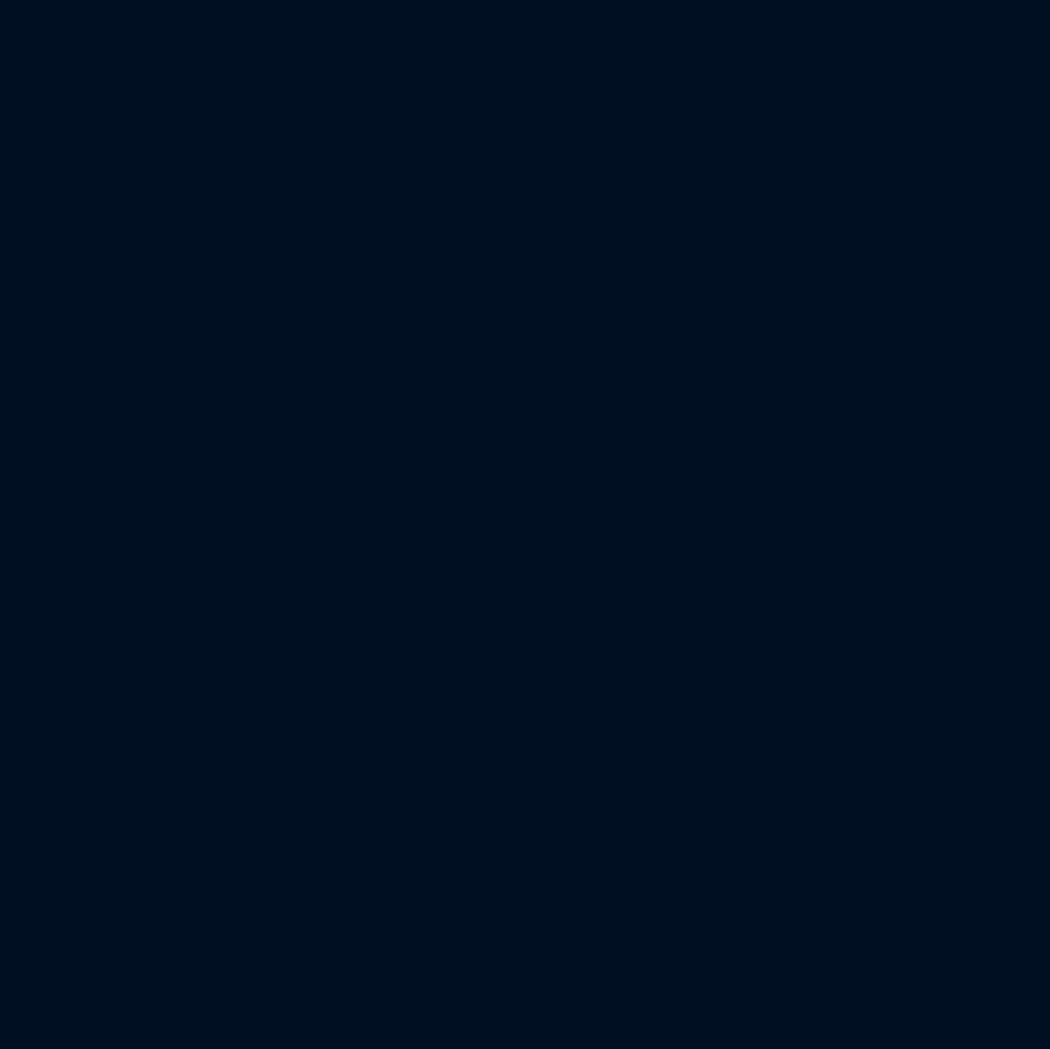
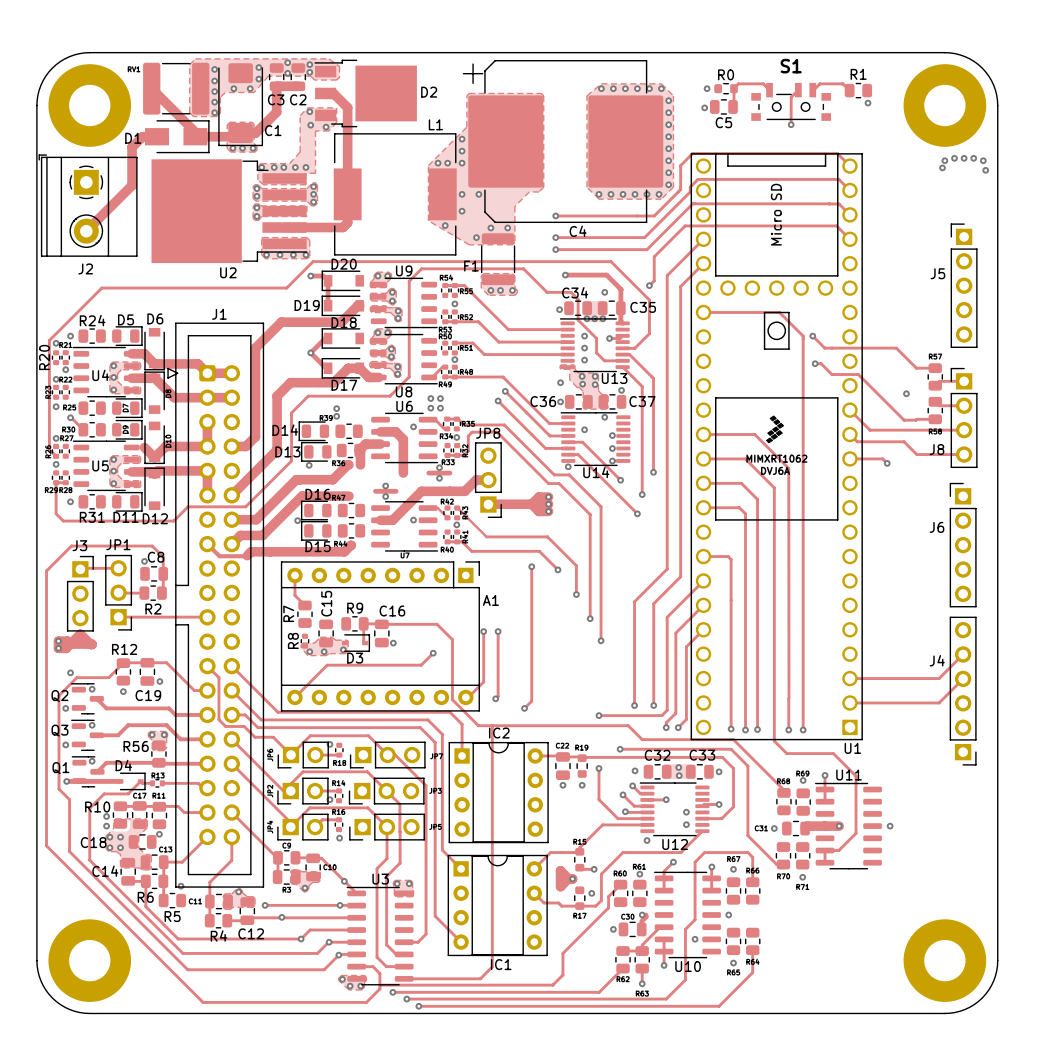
board edge: none -> (89, 52) (944, 52) (965, 56) (982, 68) (993, 85) (997, 105) (997, 960) (993, 980) (982, 998) (965, 1009) (944, 1013) (89, 1013) (69, 1009) (52, 998) (40, 980) (36, 960) (36, 105) (40, 85) (52, 68) (69, 56) (89, 52)
zone outline: none -> (195, 58) (189, 64) (189, 112) (193, 116) (216, 116) (220, 112) (220, 97) (225, 92) (254, 92) (268, 76) (310, 76) (314, 80) (336, 80) (339, 77) (339, 66) (329, 58) (195, 58)
via: none -> (287, 62)
via: none -> (309, 64)
via: none -> (258, 67)
via: none -> (214, 69)
via: none -> (309, 72)
via: none -> (287, 73)
C3: none -> (276, 77)
C2: none -> (298, 77)
via: none -> (258, 79)
via: none -> (214, 80)
zone outline: none -> (601, 83) (586, 95) (586, 187) (598, 199) (661, 199) (673, 187) (673, 95) (661, 83) (601, 83)
track: none -> (298, 86) (276, 86) (276, 112) (255, 133) (240, 133) (236, 136) (195, 136) (195, 132) (151, 88)
part: none -> (176, 88)
via: none -> (233, 88)
via: none -> (250, 88)
via: none -> (601, 88)
via: none -> (613, 88)
via: none -> (625, 88)
via: none -> (637, 88)
via: none -> (649, 88)
via: none -> (661, 88)
via: none -> (707, 88)
R0: none -> (726, 88)
track: none -> (769, 90) (763, 83) (738, 83) (733, 88) (733, 106)
track: none -> (798, 90) (791, 97) (791, 124)
track: none -> (812, 90) (819, 83) (842, 83) (849, 90)
R1: none -> (858, 90)
via: none -> (214, 91)
track: none -> (325, 93) (333, 93) (347, 107) (347, 222) (342, 227) (284, 227)
D2: none -> (365, 93)
zone outline: none -> (469, 93) (466, 95) (466, 127) (428, 165) (428, 220) (469, 244) (512, 244) (514, 242) (514, 206) (529, 191) (538, 191) (543, 187) (543, 95) (541, 93) (469, 93)
via: none -> (668, 100)
S1: none -> (791, 101)
via: none -> (214, 102)
via: none -> (868, 103)
C1: none -> (240, 104)
part: none -> (89, 105)
part: none -> (944, 105)
C5: none -> (723, 106)
zone outline: none -> (307, 107) (300, 115) (300, 152) (289, 163) (260, 163) (257, 167) (257, 179) (263, 184) (305, 184) (305, 173) (315, 173) (315, 130) (329, 130) (336, 122) (336, 107) (307, 107)
via: none -> (704, 107)
via: none -> (309, 111)
via: none -> (214, 112)
via: none -> (668, 112)
zone outline: none -> (230, 122) (227, 125) (227, 148) (230, 152) (255, 152) (256, 146) (254, 143) (254, 124) (252, 122) (230, 122)
via: none -> (668, 124)
via: none -> (791, 124)
via: none -> (310, 125)
via: none -> (326, 127)
track: none -> (157, 136) (142, 136) (132, 147) (132, 185) (86, 231)
D1: none -> (177, 136)
via: none -> (668, 136)
via: none -> (462, 139)
C4: none -> (563, 141)
via: none -> (232, 148)
via: none -> (242, 148)
via: none -> (253, 148)
via: none -> (668, 148)
via: none -> (462, 151)
via: none -> (954, 158)
via: none -> (964, 158)
via: none -> (973, 158)
via: none -> (668, 160)
via: none -> (944, 160)
via: none -> (983, 160)
via: none -> (438, 163)
via: none -> (447, 163)
via: none -> (462, 163)
track: none -> (849, 166) (837, 153) (692, 153) (680, 165) (680, 189) (654, 215) (555, 215)
via: none -> (261, 167)
via: none -> (274, 167)
via: none -> (283, 167)
via: none -> (295, 167)
via: none -> (305, 167)
via: none -> (942, 167)
via: none -> (985, 170)
via: none -> (668, 172)
zone outline: none -> (312, 182) (306, 188) (261, 188) (255, 184) (253, 186) (253, 198) (255, 201) (306, 201) (311, 205) (314, 205) (317, 203) (317, 185) (312, 182)
via: none -> (668, 184)
via: none -> (313, 186)
via: none -> (256, 188)
track: none -> (849, 190) (838, 179) (698, 179) (690, 187) (690, 191) (644, 237) (555, 237)
via: none -> (313, 194)
L1: none -> (395, 194)
via: none -> (462, 194)
via: none -> (478, 194)
via: none -> (598, 194)
via: none -> (611, 194)
via: none -> (623, 194)
via: none -> (635, 194)
via: none -> (647, 194)
via: none -> (659, 194)
via: none -> (256, 196)
via: none -> (313, 202)
zone outline: none -> (255, 203) (253, 206) (253, 218) (255, 220) (258, 220) (261, 216) (306, 216) (306, 205) (260, 205) (255, 203)
J2: none -> (88, 205)
via: none -> (256, 207)
U2: none -> (229, 211)
via: none -> (462, 211)
track: none -> (849, 214) (839, 203) (692, 203) (647, 249) (555, 249)
via: none -> (555, 215)
via: none -> (256, 216)
via: none -> (445, 225)
via: none -> (490, 228)
via: none -> (507, 228)
zone outline: none -> (262, 237) (261, 254) (265, 258) (306, 258) (309, 256) (309, 240) (306, 237) (262, 237)
via: none -> (476, 237)
via: none -> (555, 237)
track: none -> (703, 239) (667, 275) (667, 569) (634, 601) (634, 705)
track: none -> (849, 239) (836, 225) (685, 225) (654, 256) (654, 280) (649, 285)
via: none -> (555, 249)
via: none -> (266, 254)
via: none -> (279, 254)
via: none -> (293, 254)
via: none -> (305, 254)
F1: none -> (498, 259)
track: none -> (703, 263) (680, 286) (680, 576) (653, 603) (653, 705)
zone outline: none -> (377, 272) (370, 282) (370, 286) (385, 287) (386, 282) (391, 277) (391, 274) (388, 272) (377, 272)
zone outline: none -> (483, 273) (481, 276) (481, 288) (488, 295) (514, 295) (517, 292) (514, 288) (514, 276) (512, 273) (483, 273)
track: none -> (565, 275) (606, 275) (621, 289) (620, 321) (622, 323)
via: none -> (565, 275)
track: none -> (310, 276) (323, 276) (328, 280) (328, 305)
via: none -> (310, 276)
via: none -> (378, 276)
via: none -> (387, 276)
D20: none -> (342, 280)
track: none -> (445, 285) (464, 285) (508, 329) (567, 329)
via: none -> (649, 285)
J5: none -> (964, 285)
zone outline: none -> (390, 288) (386, 293) (371, 293) (370, 299) (372, 301) (387, 301) (393, 304) (396, 301) (396, 291) (390, 288)
part: none -> (445, 290)
part: none -> (454, 290)
via: none -> (490, 290)
via: none -> (500, 290)
via: none -> (512, 290)
via: none -> (392, 292)
via: none -> (604, 292)
via: none -> (392, 301)
U9: none -> (404, 302)
via: none -> (454, 303)
D19: none -> (342, 305)
track: none -> (359, 305) (341, 322) (281, 322) (255, 348) (255, 436) (245, 446) (231, 446)
zone outline: none -> (372, 305) (370, 307) (372, 312) (390, 312) (396, 321) (402, 319) (402, 310) (399, 307) (372, 305)
C34: none -> (578, 308)
C35: none -> (611, 308)
via: none -> (559, 309)
via: none -> (398, 311)
track: none -> (703, 312) (779, 312) (803, 336) (803, 730)
part: none -> (445, 316)
part: none -> (454, 316)
via: none -> (398, 318)
via: none -> (586, 318)
via: none -> (594, 318)
via: none -> (602, 318)
track: none -> (445, 321) (478, 321) (498, 342) (567, 342)
zone outline: none -> (377, 328) (370, 339) (370, 343) (385, 344) (386, 339) (391, 334) (391, 330) (388, 328) (377, 328)
via: none -> (378, 332)
via: none -> (387, 332)
track: none -> (622, 335) (620, 338) (609, 338)
via: none -> (70, 336)
R24: none -> (92, 336)
D5: none -> (127, 336)
via: none -> (584, 336)
track: none -> (812, 336) (824, 348) (896, 348) (916, 368) (935, 368)
via: none -> (812, 336)
track: none -> (328, 338) (325, 338) (310, 352) (328, 368)
D18: none -> (342, 338)
via: none -> (609, 338)
via: none -> (56, 343)
track: none -> (454, 343) (472, 343) (484, 354) (567, 354)
zone outline: none -> (390, 345) (385, 350) (371, 350) (370, 354) (372, 356) (386, 356) (392, 360) (395, 357) (395, 348) (390, 345)
U13: none -> (594, 345)
part: none -> (445, 348)
part: none -> (454, 348)
via: none -> (584, 348)
track: none -> (622, 348) (634, 348) (649, 333) (649, 300) (611, 261) (313, 261) (286, 288) (101, 288) (49, 340) (49, 449) (56, 456)
D6: none -> (154, 349)
via: none -> (391, 349)
via: none -> (310, 352)
track: none -> (131, 353) (144, 353) (154, 363) (198, 363) (207, 373) (231, 373)
track: none -> (622, 354) (629, 354) (653, 378) (653, 472)
via: none -> (391, 356)
R20: none -> (56, 357)
part: none -> (65, 357)
U8: none -> (404, 359)
via: none -> (454, 359)
via: none -> (584, 360)
track: none -> (622, 360) (604, 360) (596, 352) (596, 338) (578, 320) (578, 299) (571, 292) (547, 292) (523, 268) (421, 268) (409, 281) (409, 376) (390, 396) (308, 396) (291, 412) (291, 461) (245, 506) (188, 506) (173, 521) (63, 521) (56, 513) (56, 482) (65, 482)
zone outline: none -> (371, 361) (369, 363) (371, 368) (390, 368) (396, 377) (401, 375) (401, 364) (399, 363) (371, 361)
zone outline: none -> (112, 362) (109, 364) (109, 390) (112, 393) (139, 393) (139, 387) (123, 387) (117, 381) (117, 373) (121, 369) (138, 369) (140, 363) (138, 362) (112, 362)
track: none -> (815, 363) (821, 363) (831, 374) (858, 374) (904, 420) (935, 419)
via: none -> (815, 363)
zone outline: none -> (561, 364) (561, 369) (569, 369) (569, 379) (583, 391) (584, 409) (608, 407) (608, 396) (602, 394) (598, 390) (598, 375) (596, 373) (578, 373) (574, 364) (561, 364)
via: none -> (113, 365)
via: none -> (397, 366)
track: none -> (445, 367) (442, 367) (432, 377) (429, 377)
track: none -> (622, 367) (642, 386) (642, 494)
D17: none -> (342, 368)
via: none -> (65, 369)
U4: none -> (106, 372)
part: none -> (445, 372)
part: none -> (454, 372)
via: none -> (397, 374)
via: none -> (582, 376)
via: none -> (595, 376)
part: none -> (935, 376)
via: none -> (113, 377)
track: none -> (378, 377) (368, 377) (359, 368) (348, 368) (333, 382) (290, 382) (277, 396) (277, 449) (231, 495)
track: none -> (445, 377) (503, 377) (549, 423) (568, 423)
track: none -> (131, 378) (154, 377) (174, 397) (231, 397)
via: none -> (56, 379)
track: none -> (964, 381) (939, 381) (935, 385)
via: none -> (560, 382)
via: none -> (582, 384)
via: none -> (595, 384)
via: none -> (113, 389)
via: none -> (621, 390)
track: none -> (505, 391) (549, 435) (568, 435)
via: none -> (505, 391)
part: none -> (56, 392)
part: none -> (65, 392)
part: none -> (154, 392)
via: none -> (906, 393)
via: none -> (430, 398)
via: none -> (440, 398)
track: none -> (498, 400) (545, 448) (568, 448)
via: none -> (498, 400)
via: none -> (560, 401)
C36: none -> (578, 401)
C37: none -> (612, 401)
track: none -> (935, 401) (939, 405) (964, 405)
via: none -> (56, 406)
part: none -> (92, 408)
part: none -> (127, 408)
via: none -> (336, 408)
via: none -> (430, 408)
via: none -> (440, 408)
track: none -> (849, 410) (869, 430) (964, 430)
part: none -> (935, 410)
via: none -> (336, 416)
via: none -> (70, 417)
track: none -> (71, 417) (83, 429)
via: none -> (604, 417)
J8: none -> (964, 417)
track: none -> (428, 419) (435, 419) (444, 428) (447, 428)
track: none -> (447, 419) (458, 419) (463, 424) (504, 424) (554, 474) (569, 474) (601, 506) (601, 640)
track: none -> (207, 422) (207, 446) (165, 446) (154, 457) (144, 447)
part: none -> (447, 424)
part: none -> (456, 424)
via: none -> (413, 426)
part: none -> (92, 429)
part: none -> (127, 429)
via: none -> (584, 429)
D14: none -> (313, 431)
part: none -> (349, 431)
track: none -> (380, 431) (395, 431) (403, 439) (403, 473)
track: none -> (703, 434) (754, 434) (788, 468) (788, 698)
track: none -> (849, 434) (857, 441) (904, 441) (916, 454) (964, 454)
via: none -> (612, 435)
U6: none -> (404, 437)
via: none -> (456, 437)
via: none -> (56, 438)
U14: none -> (595, 439)
part: none -> (154, 442)
track: none -> (568, 442) (582, 442) (620, 480)
track: none -> (380, 444) (365, 444) (359, 450) (360, 464)
U1: none -> (776, 446)
via: none -> (612, 448)
part: none -> (350, 450)
part: none -> (447, 450)
part: none -> (457, 450)
part: none -> (56, 451)
part: none -> (65, 451)
D13: none -> (316, 451)
track: none -> (568, 454) (578, 454) (637, 513)
zone outline: none -> (112, 455) (109, 458) (109, 484) (112, 487) (139, 487) (139, 480) (123, 480) (117, 474) (117, 467) (121, 463) (138, 463) (140, 457) (138, 455) (112, 455)
track: none -> (447, 455) (463, 455) (468, 450) (468, 436) (472, 432) (497, 432) (548, 483) (559, 483) (590, 514) (590, 618)
track: none -> (703, 458) (745, 458) (774, 487) (774, 741) (786, 753) (833, 753) (856, 776) (856, 833) (838, 850) (825, 850) (825, 862)
track: none -> (849, 458) (882, 458) (887, 463)
via: none -> (113, 459)
via: none -> (612, 461)
via: none -> (887, 463)
via: none -> (56, 464)
track: none -> (348, 464) (332, 479) (296, 479) (256, 519) (231, 519)
U5: none -> (106, 465)
via: none -> (309, 465)
via: none -> (568, 466)
via: none -> (439, 467)
via: none -> (113, 471)
track: none -> (131, 471) (152, 471) (154, 473) (157, 470) (207, 470) (207, 495)
via: none -> (653, 472)
track: none -> (428, 473) (449, 473)
part: none -> (56, 477)
part: none -> (65, 477)
via: none -> (439, 478)
track: none -> (488, 480) (476, 480) (464, 491) (421, 491) (392, 520) (380, 520)
JP8: none -> (488, 480)
via: none -> (620, 480)
via: none -> (113, 483)
track: none -> (703, 483) (741, 483) (757, 499) (757, 729)
via: none -> (385, 485)
D12: none -> (154, 488)
track: none -> (375, 491) (396, 491)
via: none -> (642, 494)
track: none -> (348, 496) (302, 496) (262, 535) (240, 535) (231, 544)
via: none -> (385, 496)
track: none -> (548, 497) (538, 497) (531, 504) (538, 511) (548, 511)
via: none -> (548, 497)
via: none -> (70, 501)
R31: none -> (92, 501)
D11: none -> (127, 501)
track: none -> (548, 504) (488, 504)
via: none -> (548, 504)
track: none -> (703, 507) (739, 507) (745, 513) (745, 730)
track: none -> (428, 508) (437, 508) (447, 517)
track: none -> (457, 508) (486, 536) (547, 536) (576, 565) (576, 594)
D16: none -> (316, 510)
part: none -> (351, 510)
via: none -> (548, 511)
part: none -> (447, 512)
part: none -> (457, 512)
via: none -> (637, 513)
via: none -> (297, 520)
via: none -> (413, 520)
via: none -> (456, 524)
part: none -> (404, 526)
D15: none -> (316, 530)
part: none -> (351, 530)
part: none -> (447, 536)
part: none -> (457, 536)
track: none -> (447, 541) (462, 541) (471, 551) (539, 551) (558, 569)
track: none -> (207, 544) (219, 556) (246, 556) (251, 551) (344, 551) (351, 545)
J6: none -> (963, 545)
track: none -> (703, 556) (728, 556) (731, 559) (731, 729)
via: none -> (144, 561)
track: none -> (531, 566) (531, 701) (524, 708)
via: none -> (531, 566)
track: none -> (118, 568) (80, 569)
via: none -> (558, 569)
C8: none -> (154, 573)
track: none -> (294, 575) (294, 595) (304, 605)
track: none -> (703, 580) (667, 617) (667, 710) (661, 715) (598, 715)
track: none -> (118, 592) (144, 593)
JP1: none -> (118, 592)
J3: none -> (80, 593)
R2: none -> (153, 593)
track: none -> (161, 593) (163, 557) (152, 546) (71, 546) (46, 571) (46, 845) (203, 1002) (366, 1002) (379, 988) (379, 973) (372, 966) (356, 966)
via: none -> (576, 594)
J1: none -> (215, 605)
track: none -> (703, 605) (675, 633)
R7: none -> (304, 614)
track: none -> (118, 617) (207, 617)
via: none -> (590, 618)
R9: none -> (354, 623)
track: none -> (703, 629) (686, 646) (686, 719) (678, 727)
track: none -> (483, 631) (483, 681) (468, 697) (465, 697)
via: none -> (483, 631)
track: none -> (498, 631) (498, 696) (495, 698)
via: none -> (498, 631)
C15: none -> (326, 633)
C16: none -> (381, 633)
track: none -> (675, 633) (675, 713) (666, 722) (666, 727)
track: none -> (80, 634) (66, 648) (58, 648) (58, 641) (67, 641) (70, 644) (91, 644) (92, 644) (90, 644) (80, 634)
A1: none -> (380, 636)
zone outline: none -> (320, 637) (314, 643) (303, 643) (301, 645) (301, 647) (307, 655) (345, 653) (348, 650) (347, 640) (320, 637)
via: none -> (601, 640)
via: none -> (58, 641)
R8: none -> (304, 641)
D3: none -> (355, 643)
track: none -> (365, 643) (363, 623) (437, 624) (452, 639) (452, 699) (478, 725) (628, 725) (642, 739) (733, 739) (783, 790) (783, 792)
via: none -> (393, 643)
via: none -> (58, 648)
via: none -> (343, 649)
via: none -> (309, 651)
via: none -> (324, 651)
track: none -> (433, 653) (421, 665) (327, 665) (294, 697)
via: none -> (433, 653)
track: none -> (963, 654) (939, 678) (849, 678)
track: none -> (207, 666) (218, 677) (218, 719) (225, 726) (244, 726) (255, 737) (273, 737) (291, 755) (310, 735) (368, 735) (387, 755) (395, 755) (426, 785) (426, 934) (418, 942) (404, 942)
track: none -> (231, 666) (277, 712) (450, 712) (462, 724) (462, 755)
R12: none -> (123, 671)
C19: none -> (147, 671)
via: none -> (70, 672)
track: none -> (963, 678) (939, 702) (849, 702)
via: none -> (159, 681)
via: none -> (92, 689)
track: none -> (207, 690) (194, 690) (166, 662) (123, 662) (108, 677) (76, 677) (59, 695) (59, 789) (69, 799) (69, 851) (187, 969) (324, 969) (339, 954) (356, 954)
track: none -> (231, 690) (261, 719) (427, 719) (442, 734) (442, 850) (461, 868)
via: none -> (123, 691)
J4: none -> (963, 691)
Q2: none -> (87, 698)
track: none -> (96, 698) (106, 708) (169, 708) (175, 714) (207, 714)
via: none -> (495, 698)
track: none -> (788, 698) (788, 730)
via: none -> (634, 705)
via: none -> (653, 705)
via: none -> (65, 708)
via: none -> (524, 708)
track: none -> (231, 714) (245, 714) (257, 727) (420, 727) (435, 742) (435, 916) (461, 942)
via: none -> (598, 715)
via: none -> (92, 725)
track: none -> (492, 725) (492, 966) (480, 978) (404, 978)
via: none -> (666, 727)
via: none -> (678, 727)
via: none -> (731, 729)
via: none -> (757, 729)
via: none -> (745, 730)
via: none -> (788, 730)
via: none -> (803, 730)
zone outline: none -> (150, 731) (148, 736) (152, 740) (152, 748) (154, 750) (163, 750) (166, 747) (167, 733) (165, 731) (150, 731)
via: none -> (152, 734)
via: none -> (164, 734)
Q3: none -> (87, 735)
track: none -> (96, 735) (118, 735) (128, 725) (166, 725) (180, 739) (207, 739)
track: none -> (231, 739) (283, 791) (290, 791) (290, 784) (303, 771) (367, 771) (399, 804) (400, 863) (386, 876) (386, 944) (396, 954) (404, 954)
via: none -> (65, 744)
via: none -> (329, 744)
track: none -> (620, 749) (731, 749) (747, 766) (747, 835) (776, 864) (783, 864)
via: none -> (620, 749)
part: none -> (339, 750)
R56: none -> (158, 754)
part: none -> (303, 755)
track: none -> (315, 755) (339, 755)
part: none -> (387, 755)
track: none -> (535, 755) (582, 758) (722, 757) (733, 768) (733, 806) (721, 818) (702, 818)
via: none -> (92, 761)
track: none -> (207, 763) (106, 762) (97, 771)
track: none -> (231, 763) (290, 822) (290, 827) (309, 807) (367, 807) (387, 827) (387, 858) (377, 868) (377, 957) (386, 966) (404, 966)
part: none -> (562, 766)
part: none -> (582, 766)
via: none -> (678, 767)
track: none -> (598, 768) (598, 799) (617, 818) (647, 818)
via: none -> (598, 768)
via: none -> (635, 770)
Q1: none -> (88, 771)
C32: none -> (657, 771)
C33: none -> (699, 771)
via: none -> (719, 771)
via: none -> (679, 775)
track: none -> (825, 775) (825, 801)
via: none -> (825, 775)
via: none -> (803, 780)
track: none -> (66, 781) (120, 781)
via: none -> (66, 781)
D4: none -> (131, 781)
track: none -> (152, 783) (142, 783) (140, 781) (128, 793) (104, 793) (89, 808) (89, 860) (182, 953) (317, 953) (328, 942) (356, 942)
part: none -> (157, 783)
track: none -> (162, 783) (198, 783) (203, 788) (207, 788)
via: none -> (562, 785)
via: none -> (582, 785)
track: none -> (632, 785) (640, 793) (647, 793)
via: none -> (632, 785)
part: none -> (302, 791)
track: none -> (315, 791) (338, 791)
part: none -> (386, 791)
IC2: none -> (498, 792)
track: none -> (623, 794) (634, 806) (647, 806)
via: none -> (623, 794)
part: none -> (339, 795)
via: none -> (329, 799)
track: none -> (666, 799) (647, 799)
via: none -> (666, 799)
part: none -> (783, 801)
part: none -> (803, 802)
track: none -> (719, 804) (704, 804) (702, 806)
via: none -> (719, 804)
track: none -> (120, 806) (178, 806) (184, 812) (207, 812)
U12: none -> (674, 809)
track: none -> (625, 811) (647, 812)
via: none -> (625, 811)
track: none -> (231, 812) (277, 857) (277, 877)
via: none -> (686, 812)
R10: none -> (120, 815)
part: none -> (139, 815)
part: none -> (159, 815)
via: none -> (106, 816)
zone outline: none -> (115, 818) (113, 820) (113, 828) (106, 836) (106, 848) (108, 851) (116, 851) (120, 854) (120, 865) (122, 867) (149, 869) (151, 867) (151, 856) (145, 854) (138, 847) (138, 836) (147, 827) (147, 820) (145, 818) (115, 818)
track: none -> (338, 819) (322, 819) (315, 827)
part: none -> (338, 824)
track: none -> (647, 824) (602, 824) (579, 847) (579, 852) (550, 852) (534, 868)
via: none -> (686, 824)
via: none -> (106, 826)
track: none -> (839, 826) (807, 826) (805, 828)
via: none -> (839, 826)
U11: none -> (848, 826)
via: none -> (890, 826)
part: none -> (302, 827)
part: none -> (387, 827)
via: none -> (774, 828)
part: none -> (795, 828)
track: none -> (702, 831) (681, 852) (623, 852) (601, 874) (601, 900) (595, 906) (561, 906) (558, 902) (544, 902) (534, 893)
via: none -> (159, 834)
track: none -> (207, 836) (182, 862) (163, 862) (163, 900)
track: none -> (231, 836) (231, 860) (209, 882) (209, 920)
via: none -> (109, 837)
via: none -> (120, 837)
via: none -> (339, 838)
via: none -> (647, 840)
C18: none -> (142, 841)
via: none -> (109, 847)
via: none -> (120, 847)
part: none -> (783, 855)
part: none -> (802, 855)
part: none -> (286, 857)
track: none -> (295, 857) (321, 858) (356, 893)
part: none -> (579, 859)
part: none -> (154, 862)
track: none -> (673, 862) (664, 871) (664, 890)
via: none -> (673, 862)
track: none -> (711, 866) (711, 890)
via: none -> (711, 866)
part: none -> (313, 867)
track: none -> (579, 867) (594, 869)
zone outline: none -> (292, 869) (319, 871) (320, 880) (312, 882) (308, 889) (304, 891) (296, 884) (290, 882) (290, 871) (292, 869)
via: none -> (594, 869)
via: none -> (733, 869)
C14: none -> (128, 871)
via: none -> (639, 874)
part: none -> (286, 877)
via: none -> (802, 877)
track: none -> (568, 878) (560, 870) (560, 886) (568, 878) (572, 878)
via: none -> (572, 878)
track: none -> (128, 880) (145, 881) (145, 906) (178, 939) (301, 939) (310, 930) (356, 930)
zone outline: none -> (395, 880) (393, 885) (396, 896) (413, 895) (412, 882) (410, 880) (395, 880)
R6: none -> (154, 881)
via: none -> (344, 881)
track: none -> (752, 882) (752, 857) (747, 852) (704, 852) (695, 862) (695, 919) (685, 929) (685, 979) (666, 999) (406, 999)
via: none -> (397, 883)
via: none -> (409, 883)
track: none -> (620, 884) (608, 896) (608, 907) (562, 953) (562, 975) (552, 985) (379, 985)
via: none -> (181, 886)
zone outline: none -> (237, 888) (231, 893) (223, 895) (223, 907) (225, 909) (253, 907) (255, 898) (247, 896) (237, 888)
via: none -> (304, 888)
part: none -> (733, 890)
part: none -> (752, 890)
via: none -> (238, 891)
via: none -> (591, 893)
part: none -> (620, 893)
part: none -> (639, 893)
part: none -> (579, 898)
R5: none -> (172, 900)
part: none -> (218, 901)
track: none -> (265, 905) (356, 905)
via: none -> (265, 905)
via: none -> (340, 905)
IC1: none -> (497, 905)
C12: none -> (247, 911)
via: none -> (642, 914)
track: none -> (646, 914) (641, 921)
U10: none -> (687, 914)
via: none -> (728, 914)
via: none -> (281, 917)
track: none -> (356, 917) (249, 917) (246, 920) (227, 920)
R4: none -> (218, 920)
track: none -> (664, 927) (660, 927) (642, 945) (642, 951) (623, 951)
via: none -> (613, 929)
part: none -> (632, 929)
U3: none -> (380, 936)
via: none -> (301, 939)
track: none -> (664, 939) (664, 965)
via: none -> (695, 939)
part: none -> (733, 941)
part: none -> (752, 941)
via: none -> (329, 942)
track: none -> (752, 950) (752, 972) (719, 1006) (418, 1006)
via: none -> (338, 955)
part: none -> (623, 959)
part: none -> (642, 959)
part: none -> (89, 960)
part: none -> (944, 960)
via: none -> (733, 963)
via: none -> (664, 965)
track: none -> (623, 968) (599, 992) (392, 992)
track: none -> (642, 968) (642, 983)
zone outline: none -> (341, 975) (338, 980) (349, 989) (361, 989) (364, 987) (366, 980) (364, 975) (341, 975)
via: none -> (342, 979)
via: none -> (642, 983)
via: none -> (350, 986)
via: none -> (360, 986)
via: none -> (392, 992)
via: none -> (406, 999)
via: none -> (418, 1006)

